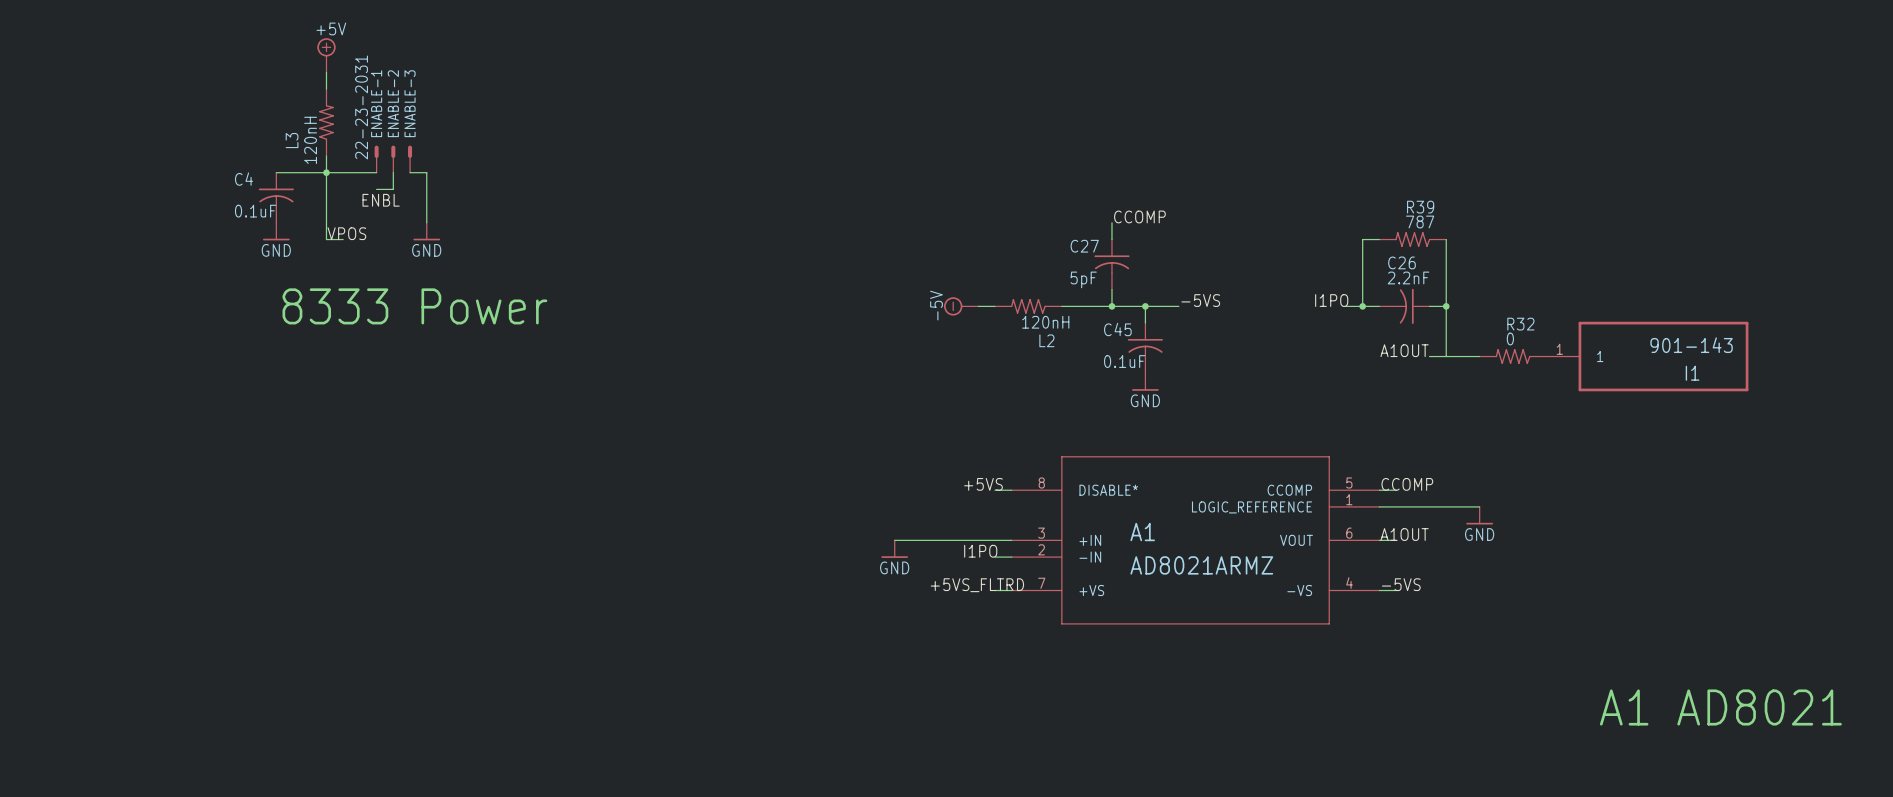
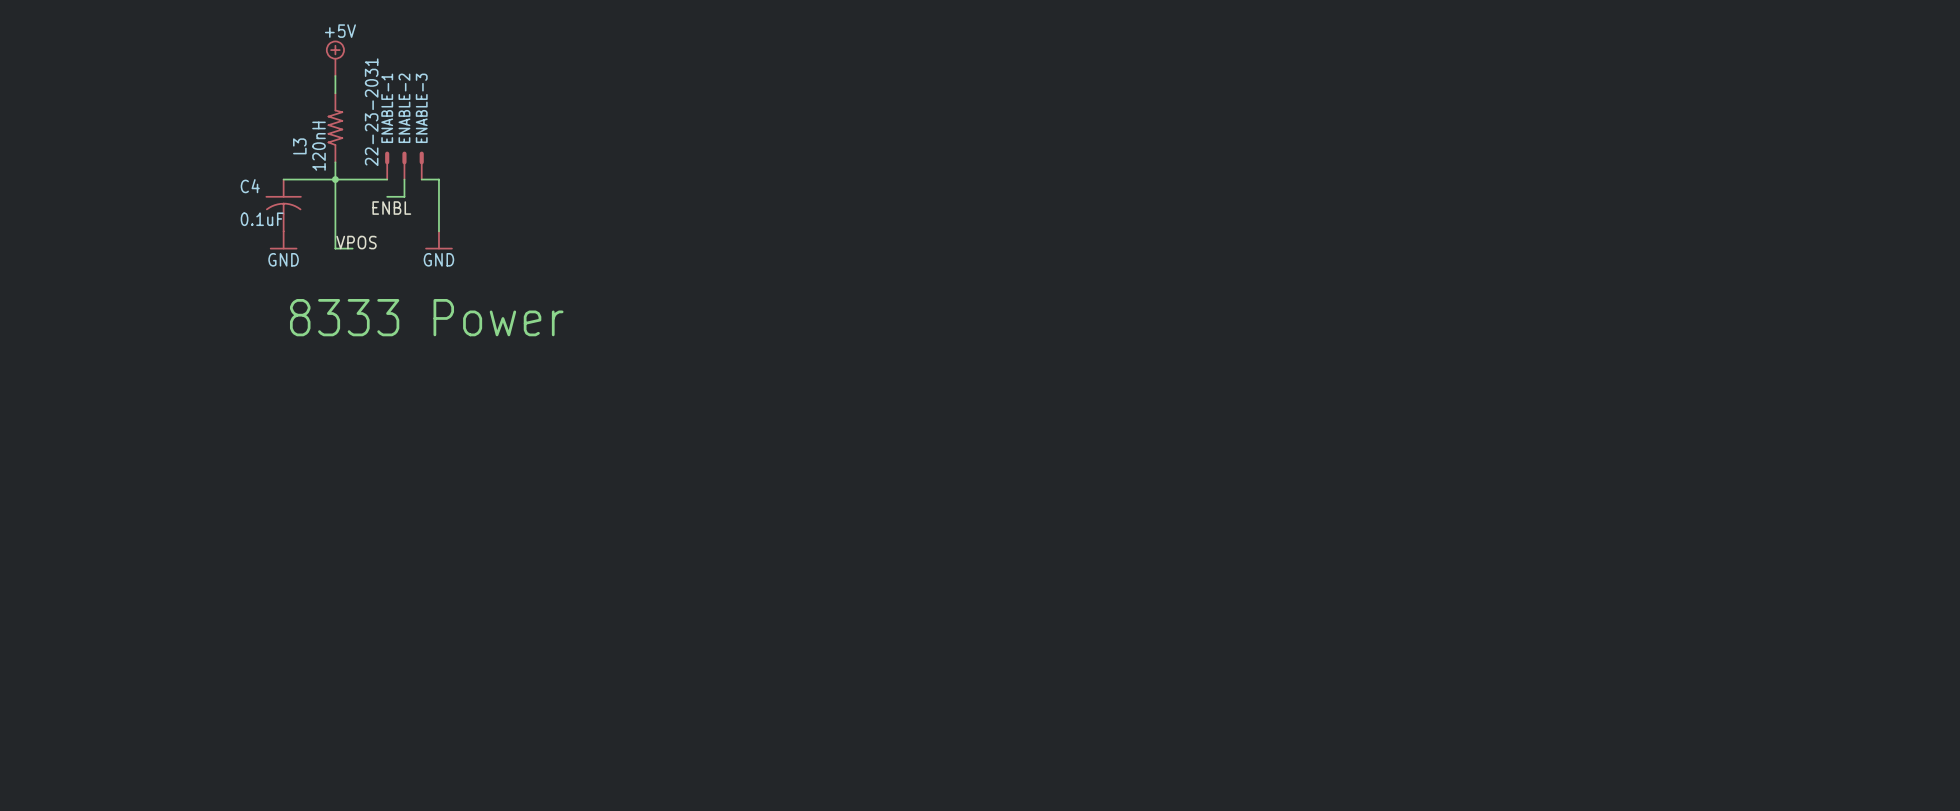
label: CCOMP (1139, 216) -> none
wire: (1111, 222) (1111, 239) -> none
wire: (1379, 239) (1362, 239) (1362, 306) -> none
R39: 787 (1412, 239) -> none
wire: (1446, 239) (1446, 356) -> none
C27: 5pF (1111, 264) -> none
wire: (1111, 289) (1111, 306) -> none
label: -5VS (1200, 300) -> none
label: I1PO (1331, 300) -> none
power symbol: -5V (961, 306) -> none
wire: (978, 306) (994, 306) -> none
L2: 120nH (1028, 306) -> none
wire: (1061, 306) (1178, 306) -> none
junction: (1111, 306) -> none
wire: (1145, 306) (1145, 323) -> none
junction: (1145, 306) -> none
wire: (1345, 306) (1379, 306) -> none
junction: (1362, 306) -> none
C26: 2.2nF (1404, 306) -> none
wire: (1429, 306) (1446, 306) -> none
junction: (1446, 306) -> none
C45: 0.1uF (1145, 348) -> none
label: A1OUT (1404, 350) -> none
wire: (1429, 356) (1479, 356) -> none
R32: 0 (1513, 356) -> none
I1: 901-143 (1647, 356) -> none
power symbol: GND (1145, 382) -> none
label: +5VS (983, 484) -> none
label: CCOMP (1407, 484) -> none
wire: (994, 490) (1011, 490) -> none
wire: (1379, 490) (1396, 490) -> none
wire: (1379, 506) (1479, 506) -> none
power symbol: GND (1479, 515) -> none
label: A1OUT (1404, 534) -> none
wire: (894, 540) (1011, 540) -> none
A1: AD8021ARMZ (1195, 540) -> none
wire: (1379, 540) (1396, 540) -> none
power symbol: GND (894, 549) -> none
label: I1PO (980, 551) -> none
wire: (994, 557) (1011, 557) -> none
label: -5VS (1401, 584) -> none
label: +5VS_FLTRD (977, 585) -> none
wire: (994, 590) (1011, 590) -> none
wire: (1379, 590) (1396, 590) -> none
text: A1 AD8021 (1720, 707) -> none

